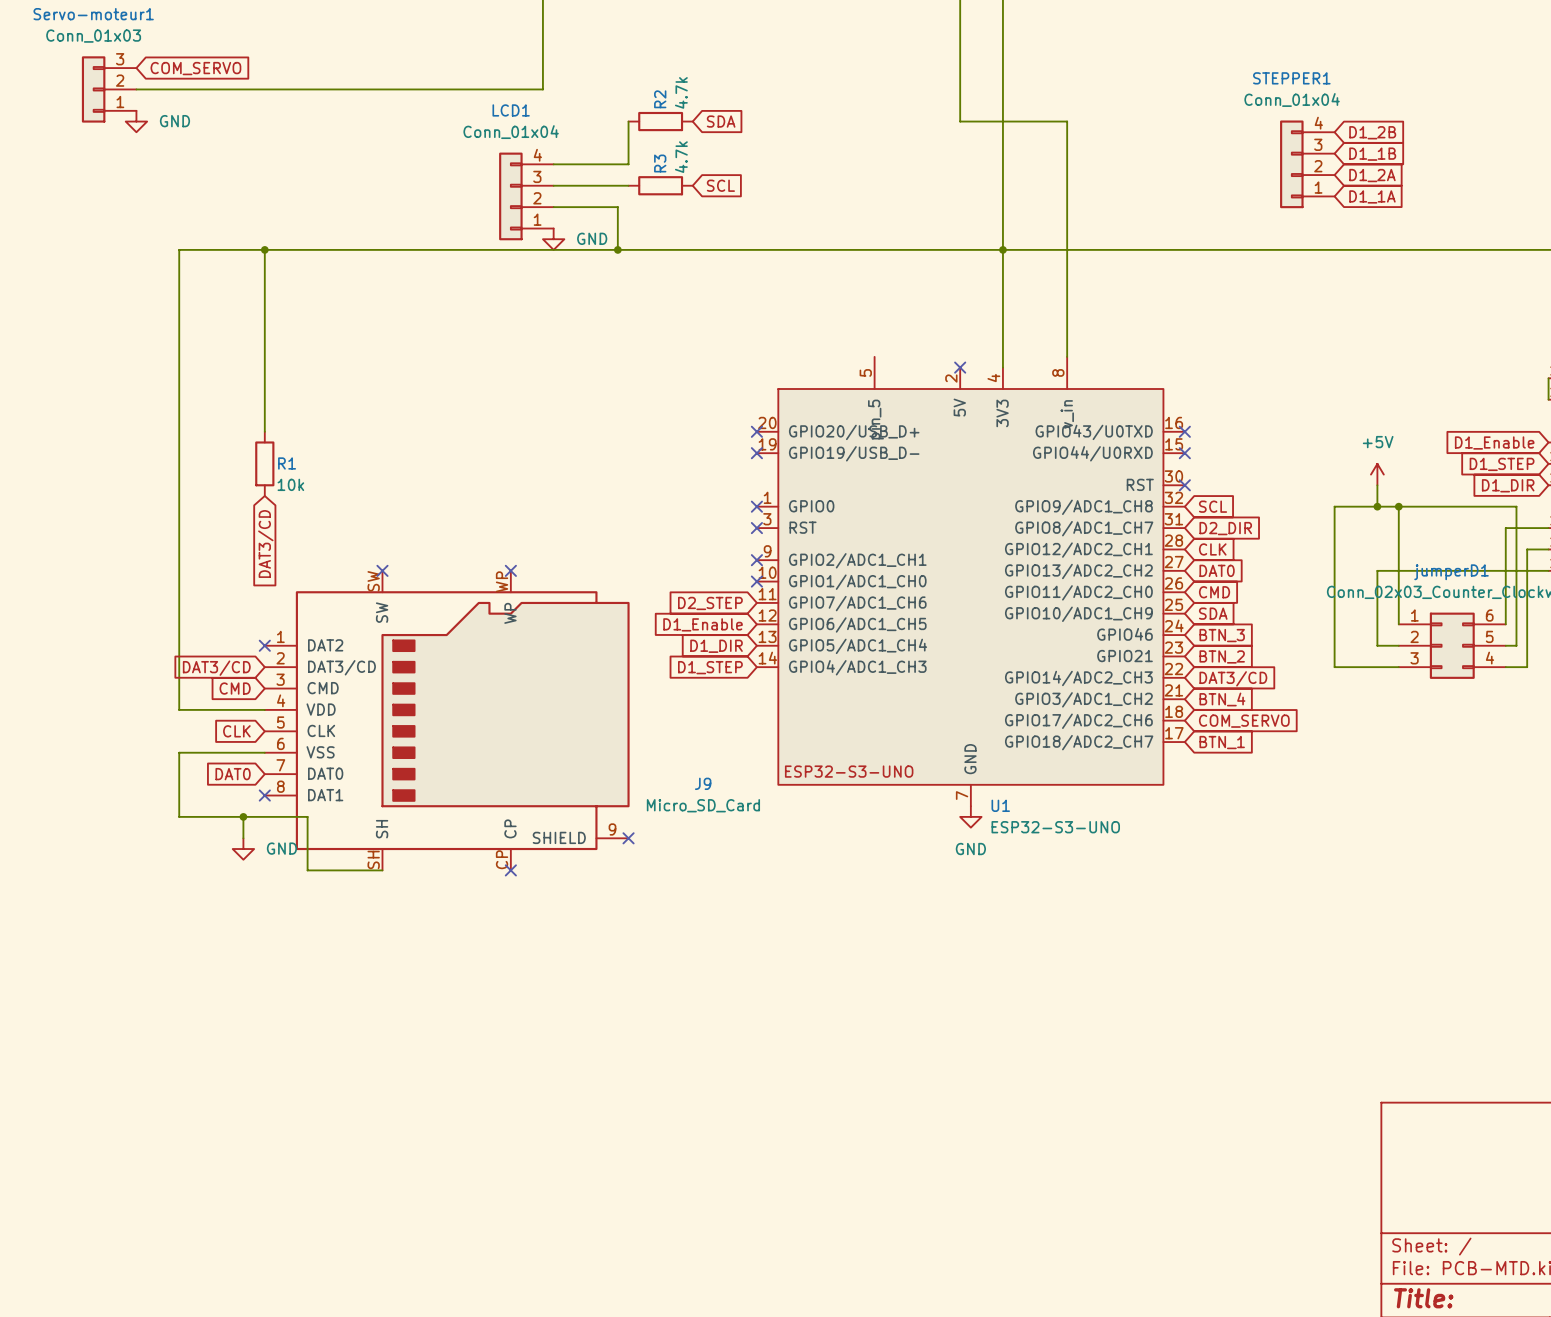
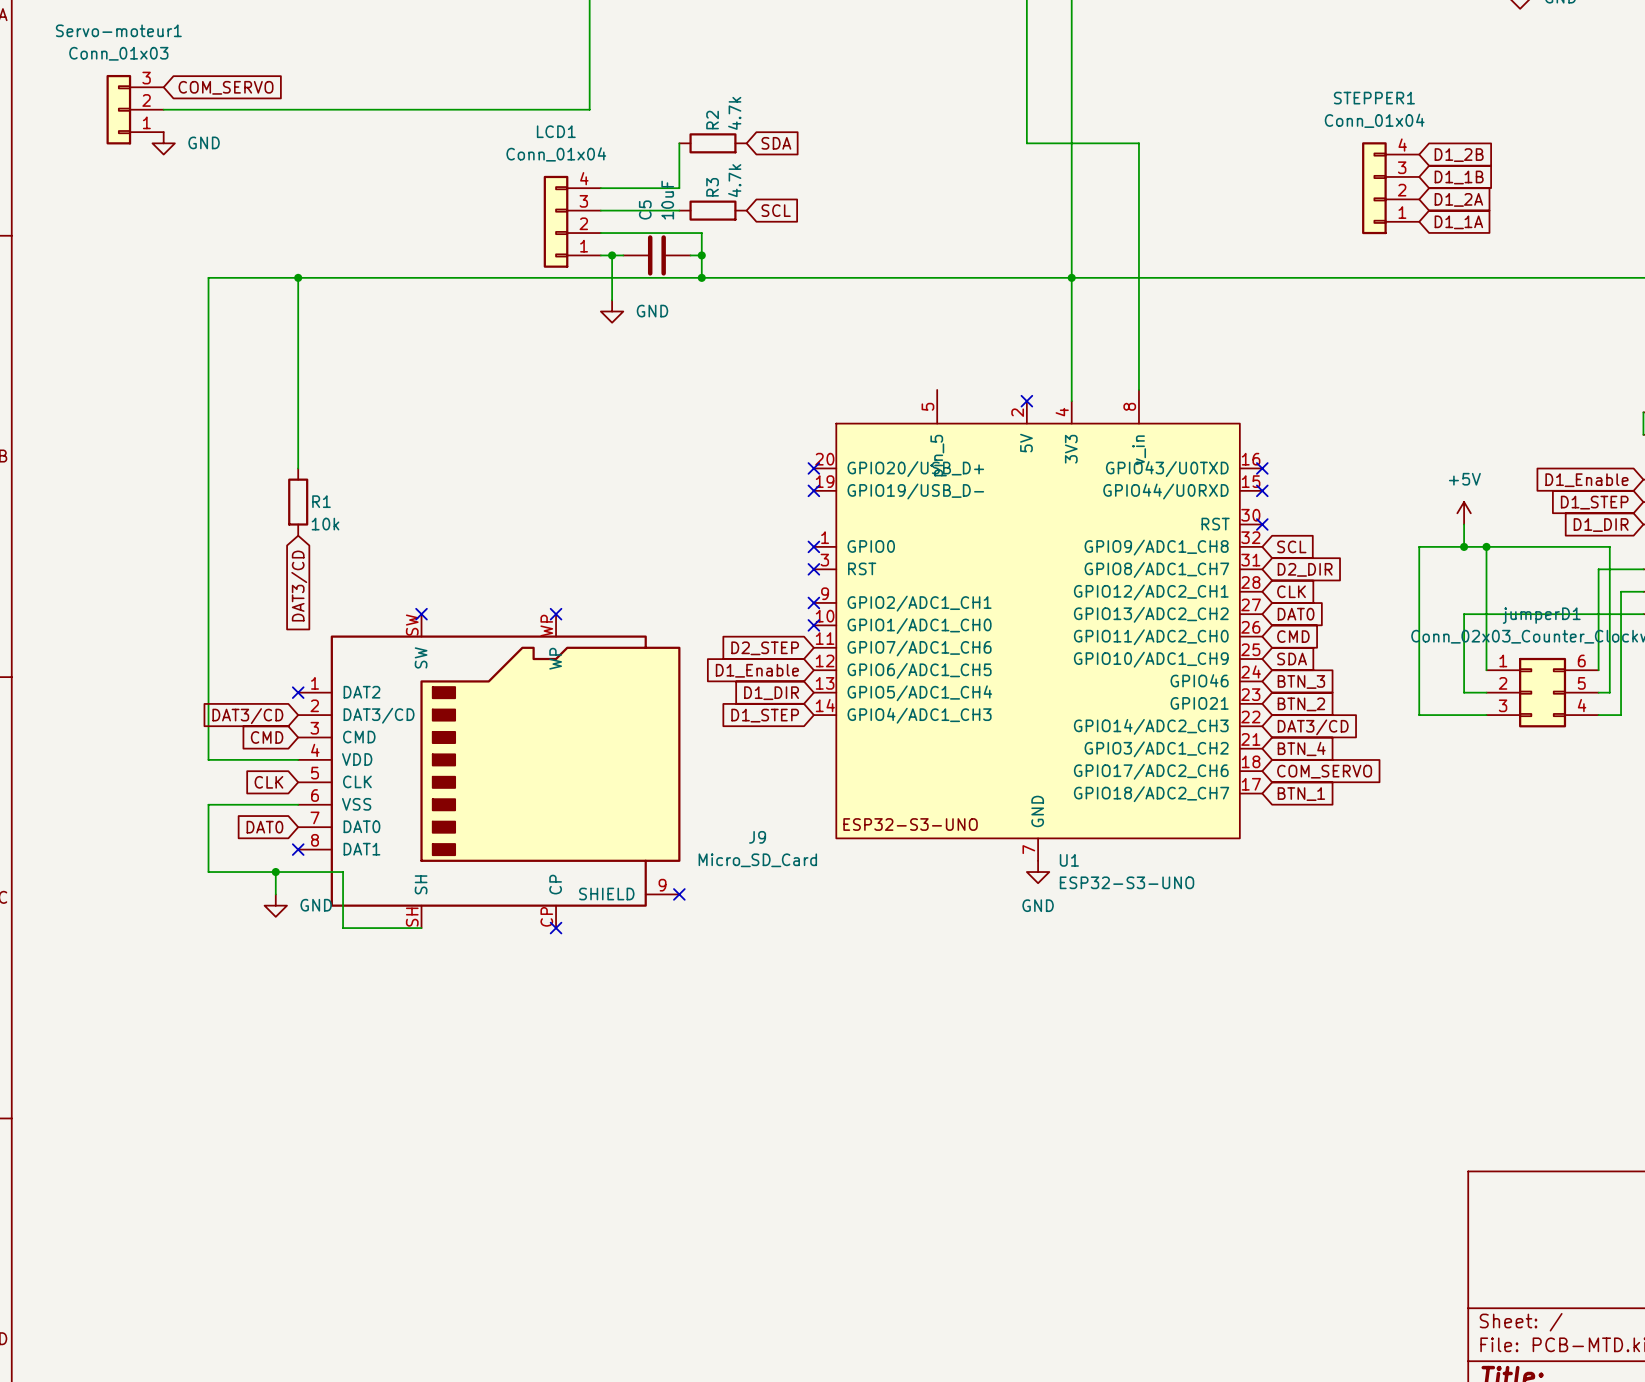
wire: (617, 207) (617, 249) -> (668, 233) (701, 233) (701, 277)
wire: none -> (600, 255) (623, 255)
wire: none -> (612, 255) (612, 300)
junction: none -> (612, 255)
C5: none -> 10uF (656, 255)
wire: none -> (690, 255) (701, 255)
junction: none -> (701, 255)
power symbol position: GND (553, 239) -> GND (612, 311)
junction: (617, 249) -> none
junction: none -> (701, 277)

